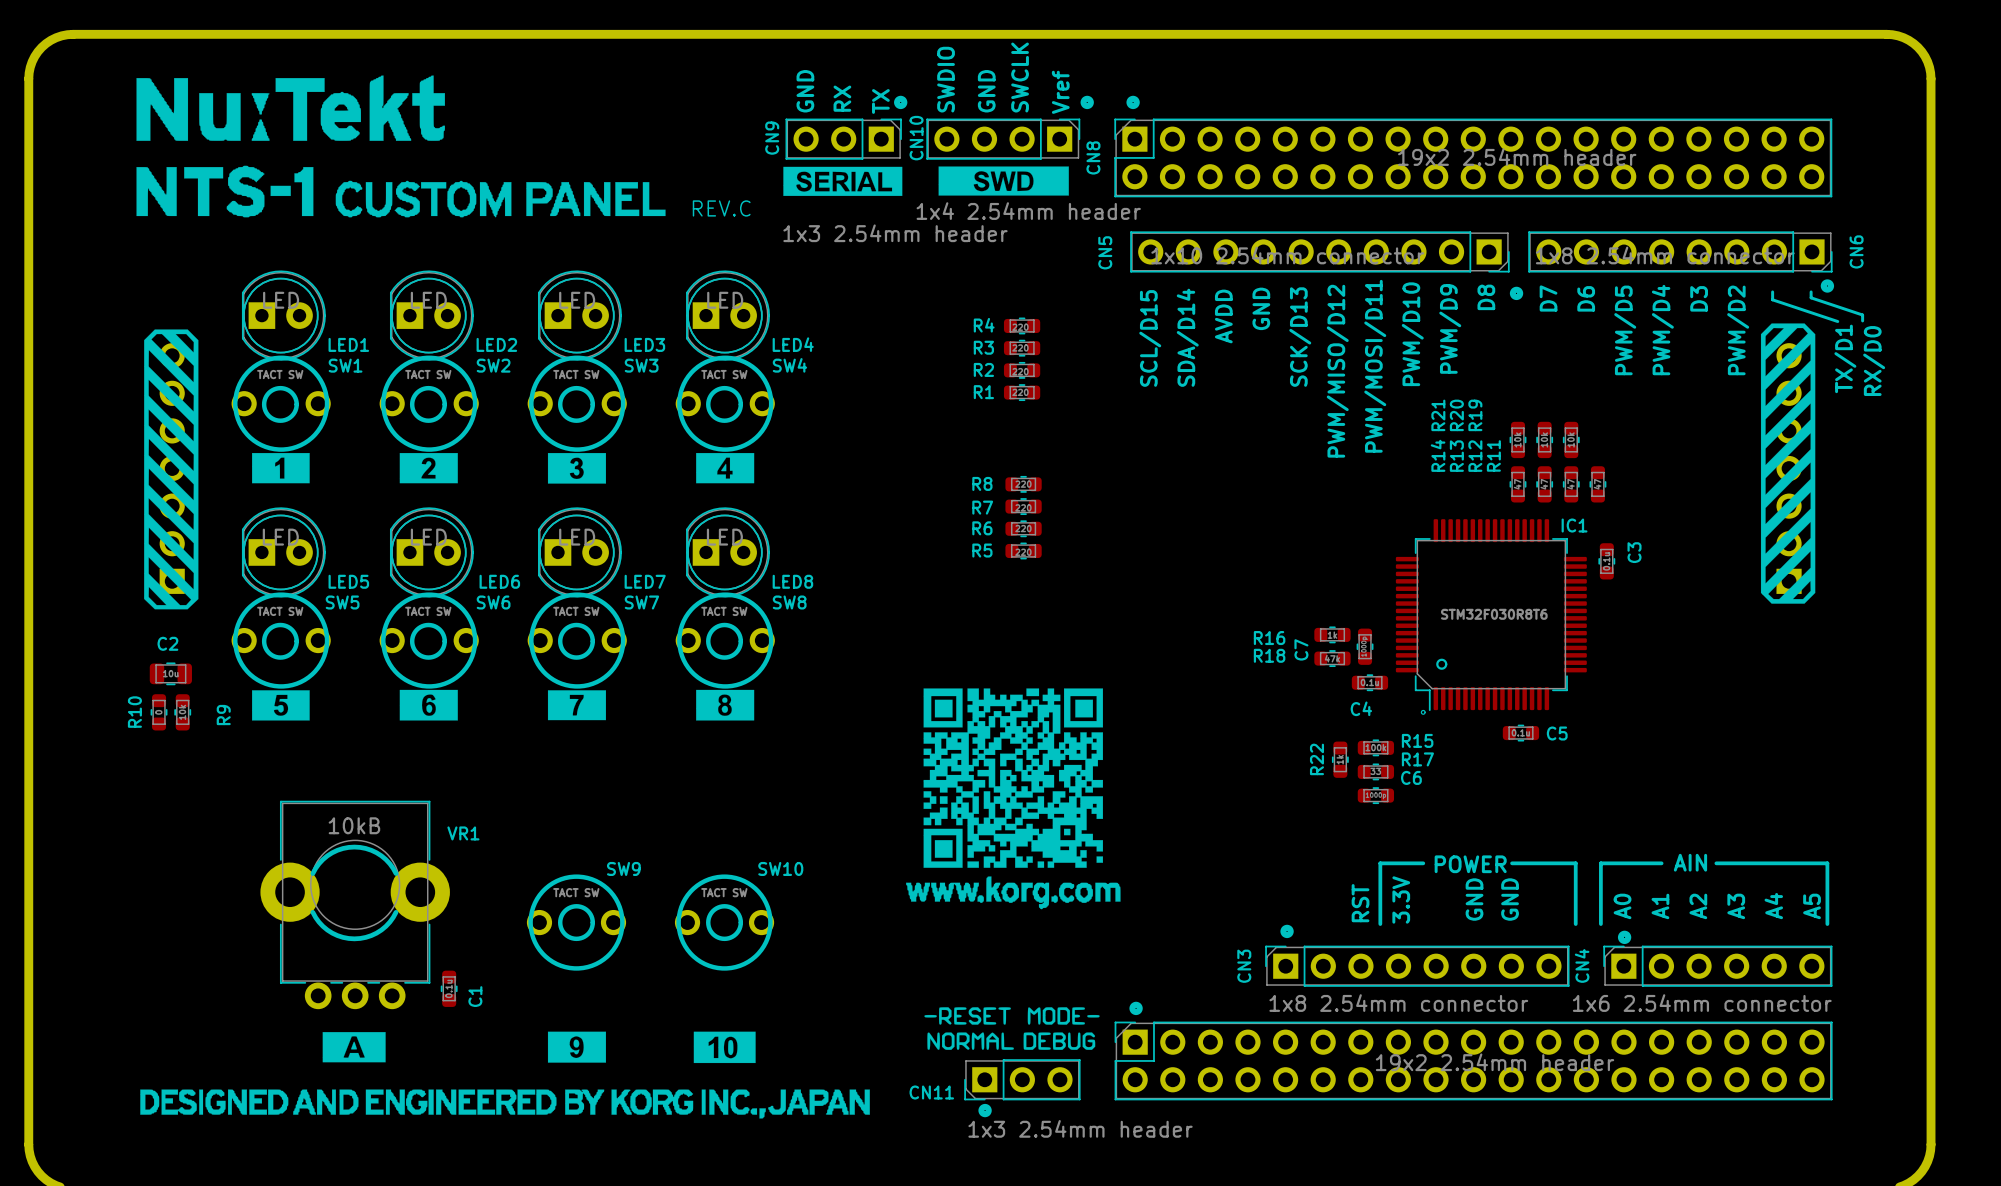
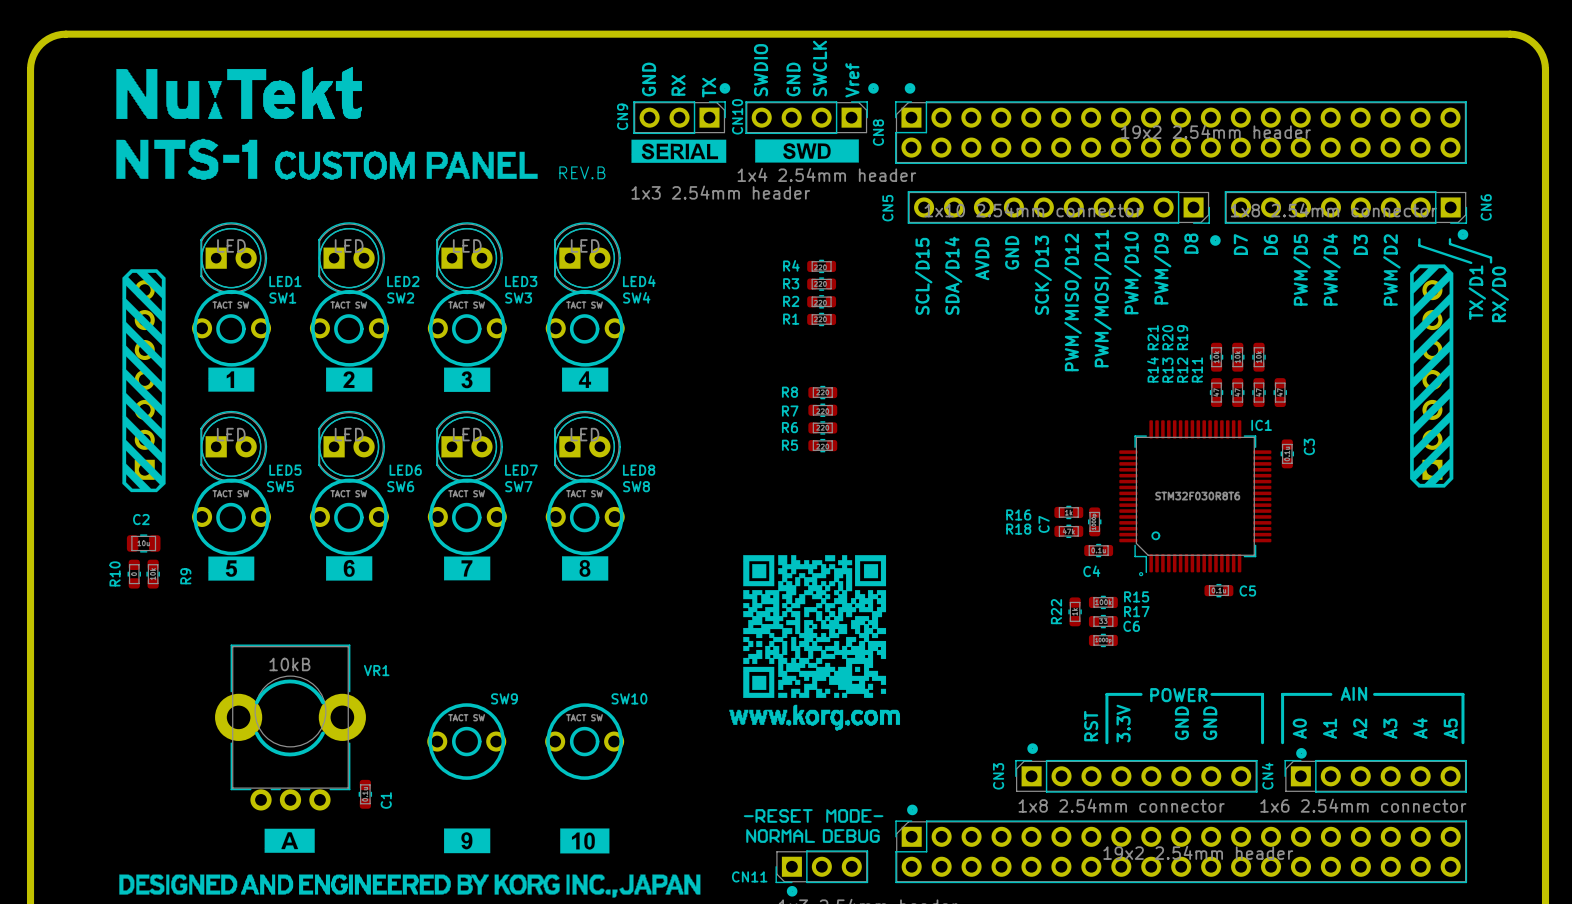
text: REV.C (721, 208) -> REV.B (582, 172)

